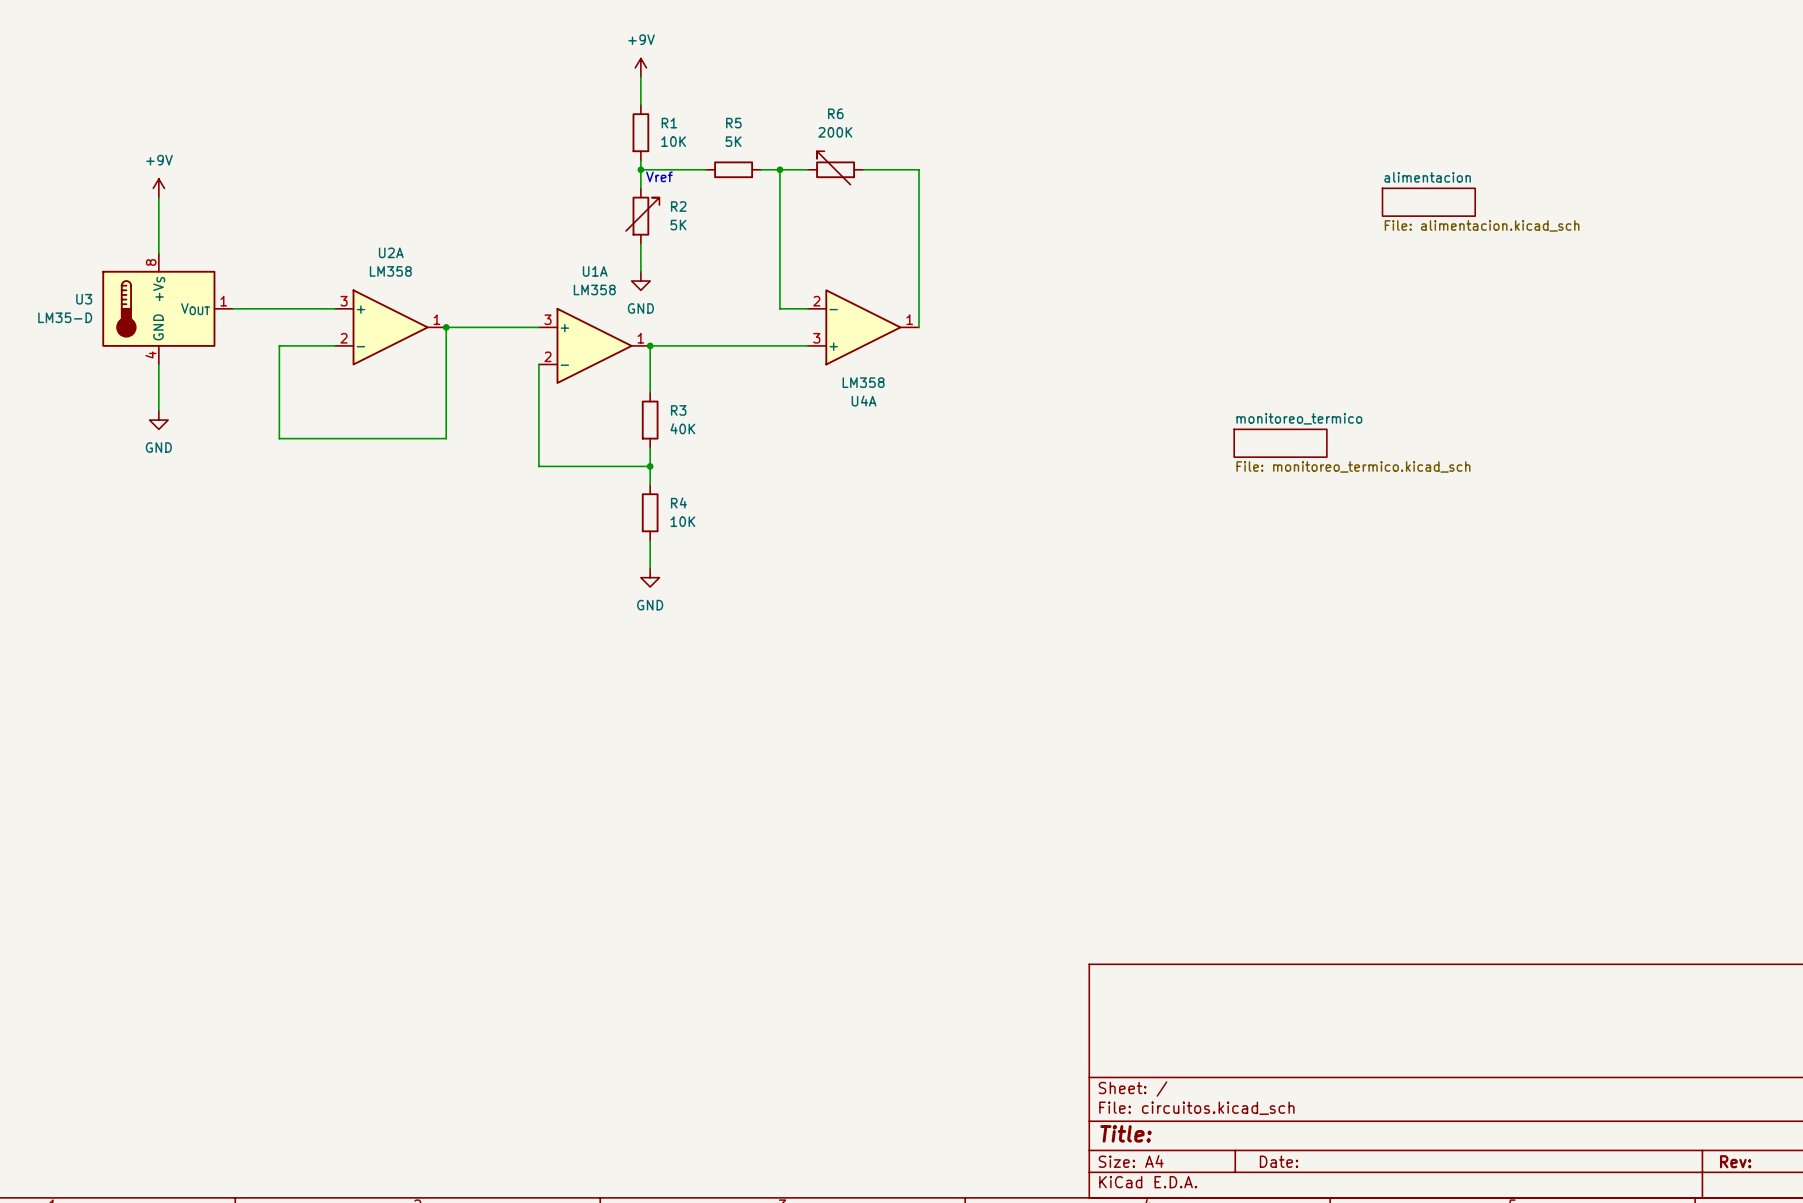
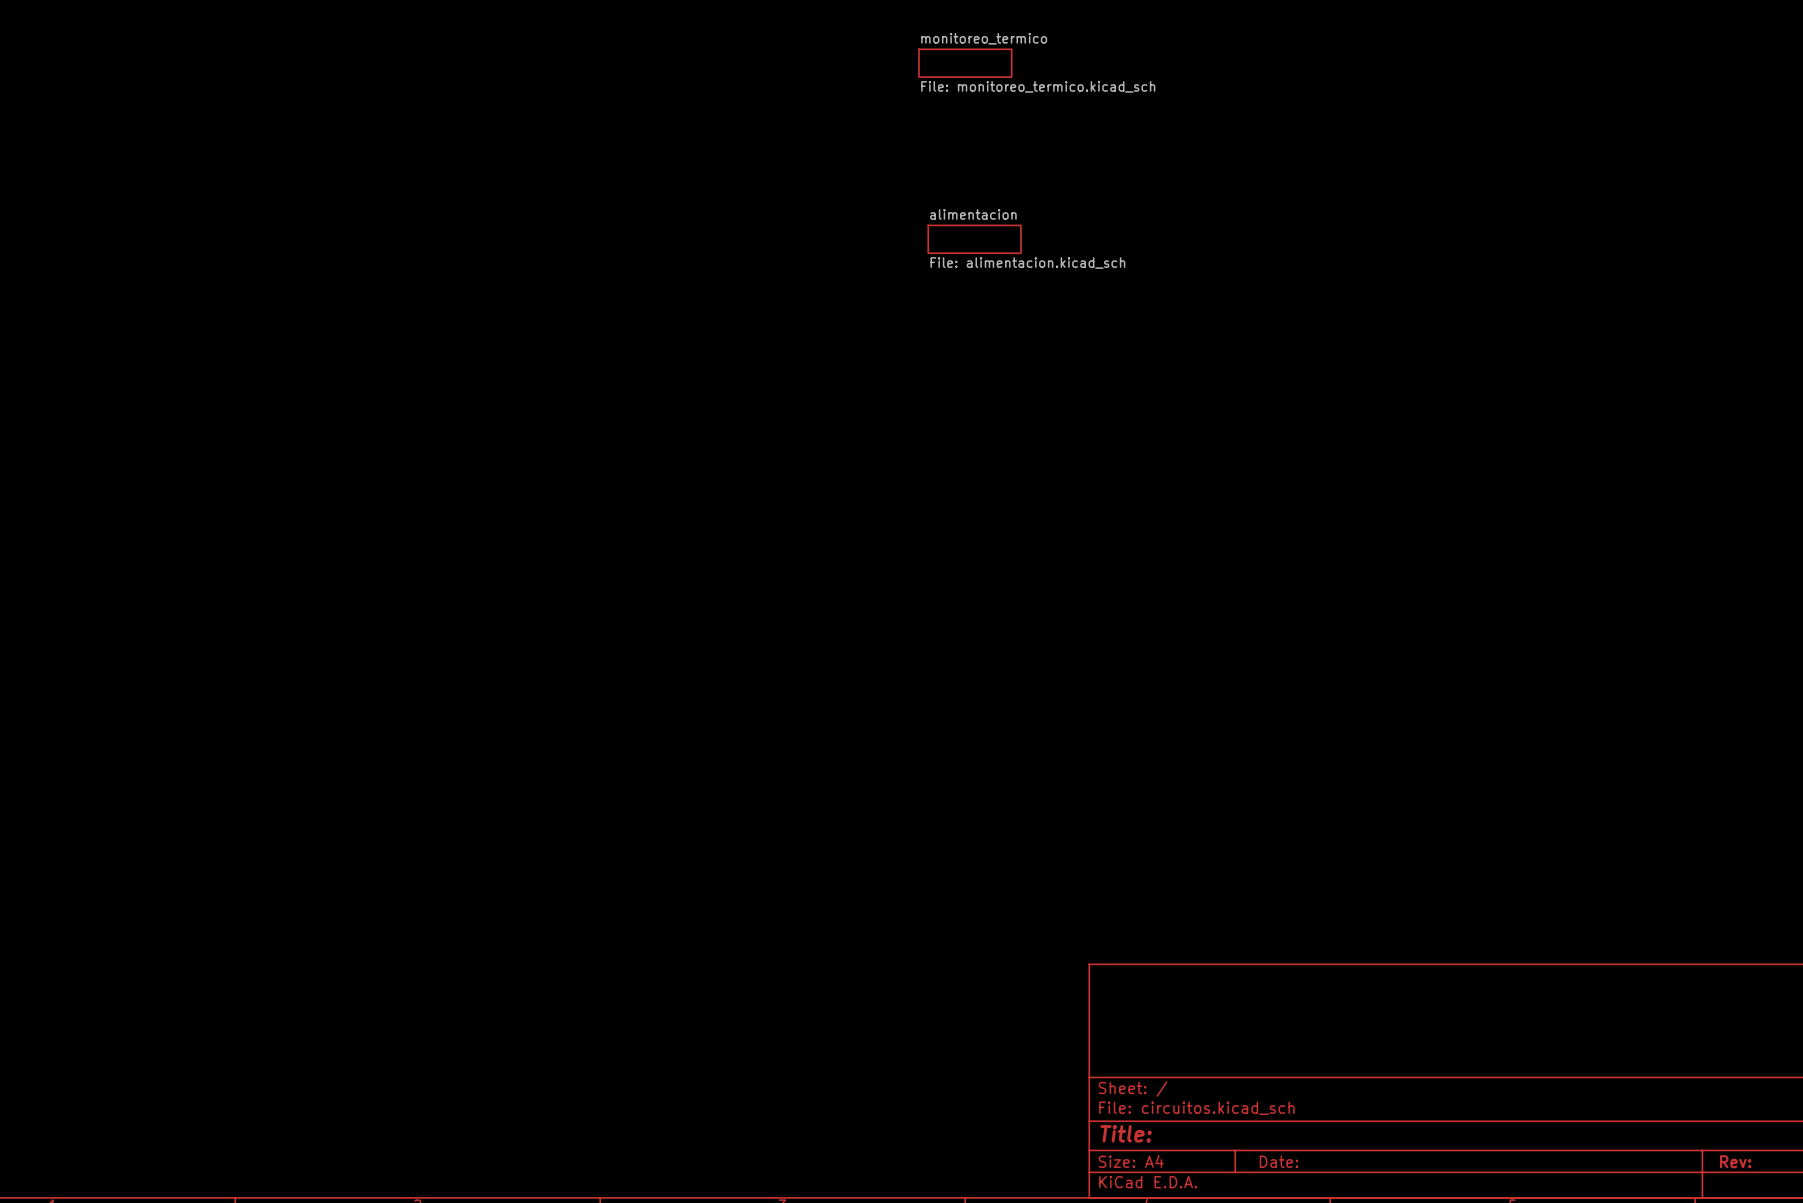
sheet monitoreo_termico: none -> File: monitoreo_termico.kicad_sch (965, 63)
power symbol: +9V (640, 67) -> none
wire: (640, 77) (640, 104) -> none
R1: 10K (640, 132) -> none
wire: (640, 160) (640, 188) -> none
R6: 200K (835, 167) -> none
wire: (640, 169) (705, 169) -> none
junction: (640, 169) -> none
R5: 5K (733, 169) -> none
wire: (761, 169) (807, 169) -> none
wire: (779, 169) (779, 308) (807, 308) -> none
junction: (779, 169) -> none
wire: (863, 169) (918, 169) (918, 327) -> none
text: Vref (659, 176) -> none
power symbol: +9V (158, 188) -> none
wire: (158, 197) (158, 253) -> none
sheet alimentacion: File: alimentacion.kicad_sch (1428, 202) -> none
R2: 5K (642, 216) -> none
sheet alimentacion: none -> File: alimentacion.kicad_sch (974, 239)
wire: (640, 243) (640, 271) -> none
power symbol: GND (640, 281) -> none
U3: LM35-D (167, 308) -> none
wire: (233, 308) (334, 308) -> none
U2A: LM358 (390, 327) -> none
junction: (446, 327) -> none
wire: (538, 327) (446, 327) (446, 438) (279, 438) (279, 345) (334, 345) -> none
U4A: LM358 (863, 327) -> none
U1A: LM358 (594, 345) -> none
junction: (650, 345) -> none
wire: (807, 345) (650, 345) (650, 392) -> none
wire: (158, 364) (158, 410) -> none
wire: (538, 364) (538, 466) (650, 466) -> none
power symbol: GND (158, 420) -> none
R3: 40K (650, 420) -> none
sheet monitoreo_termico: File: monitoreo_termico.kicad_sch (1280, 443) -> none
wire: (650, 447) (650, 484) -> none
junction: (650, 466) -> none
R4: 10K (650, 512) -> none
wire: (650, 540) (650, 568) -> none
power symbol: GND (650, 577) -> none

